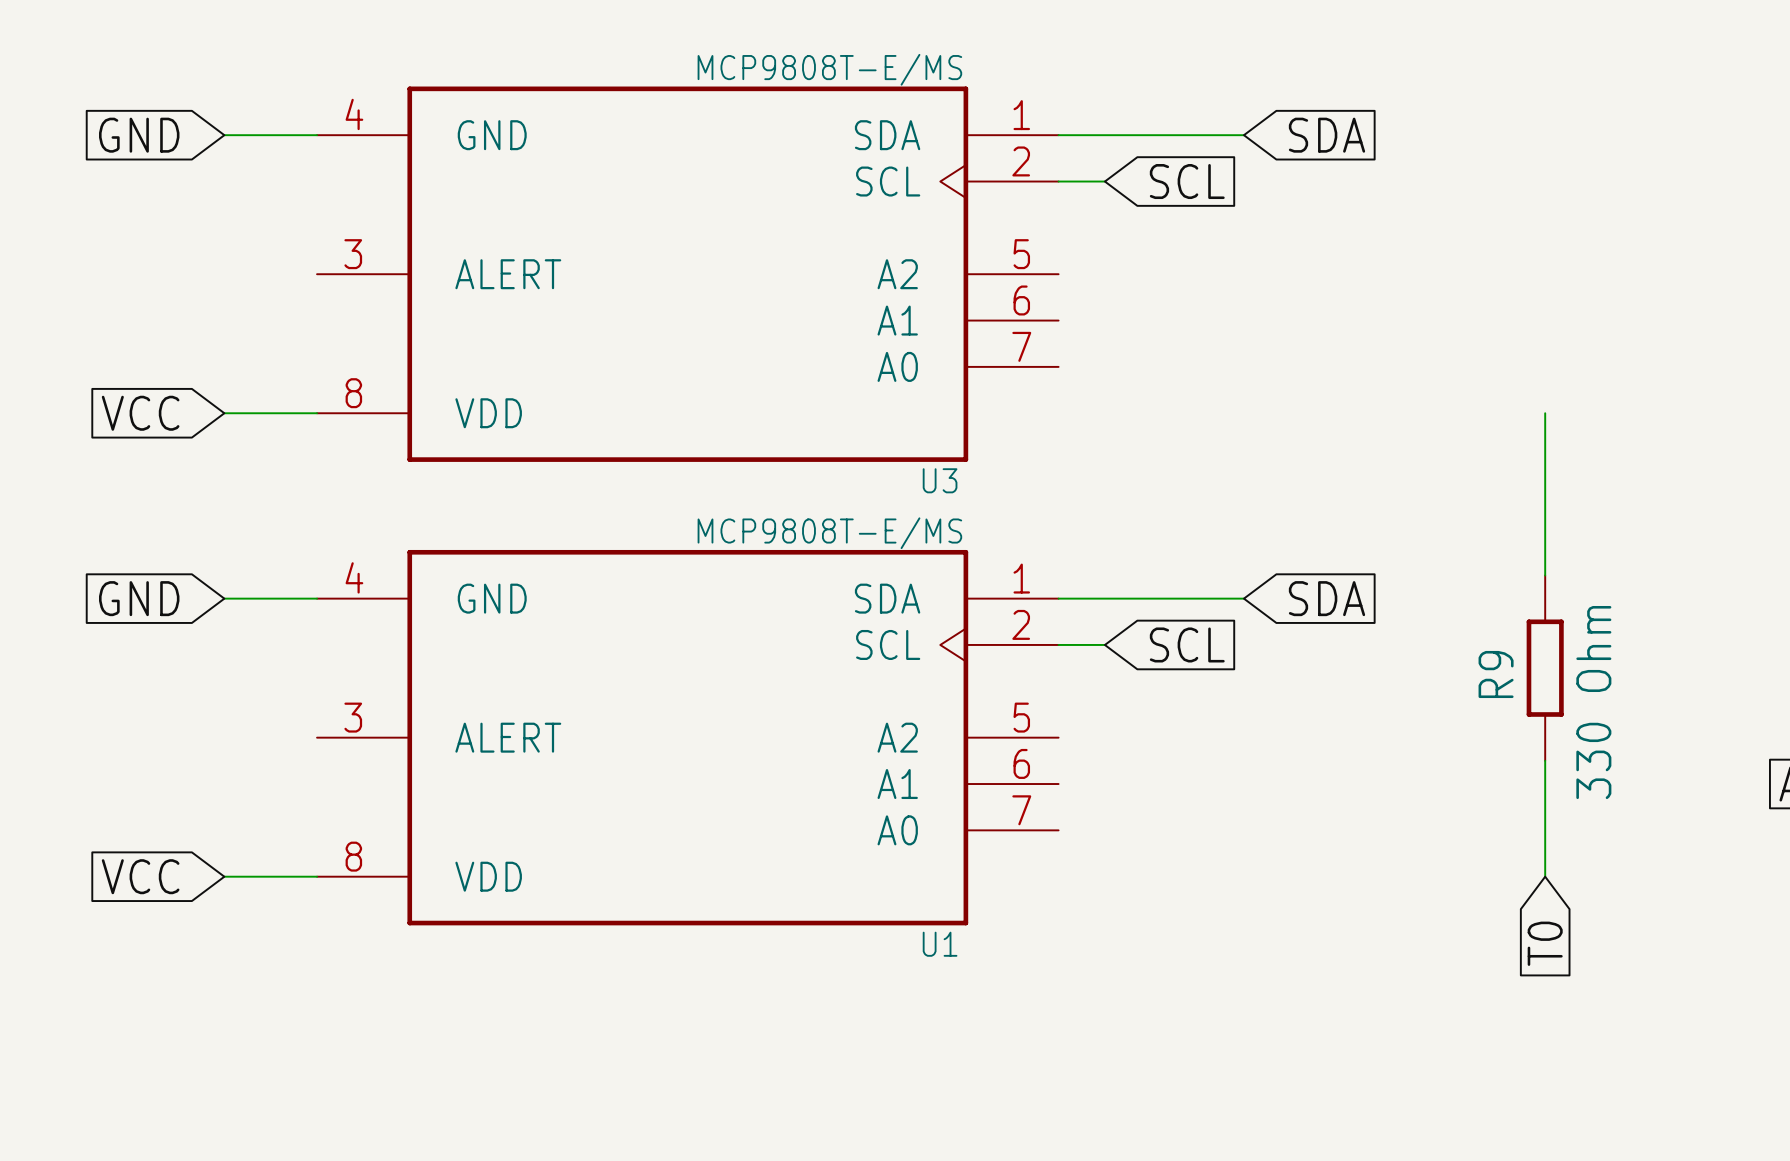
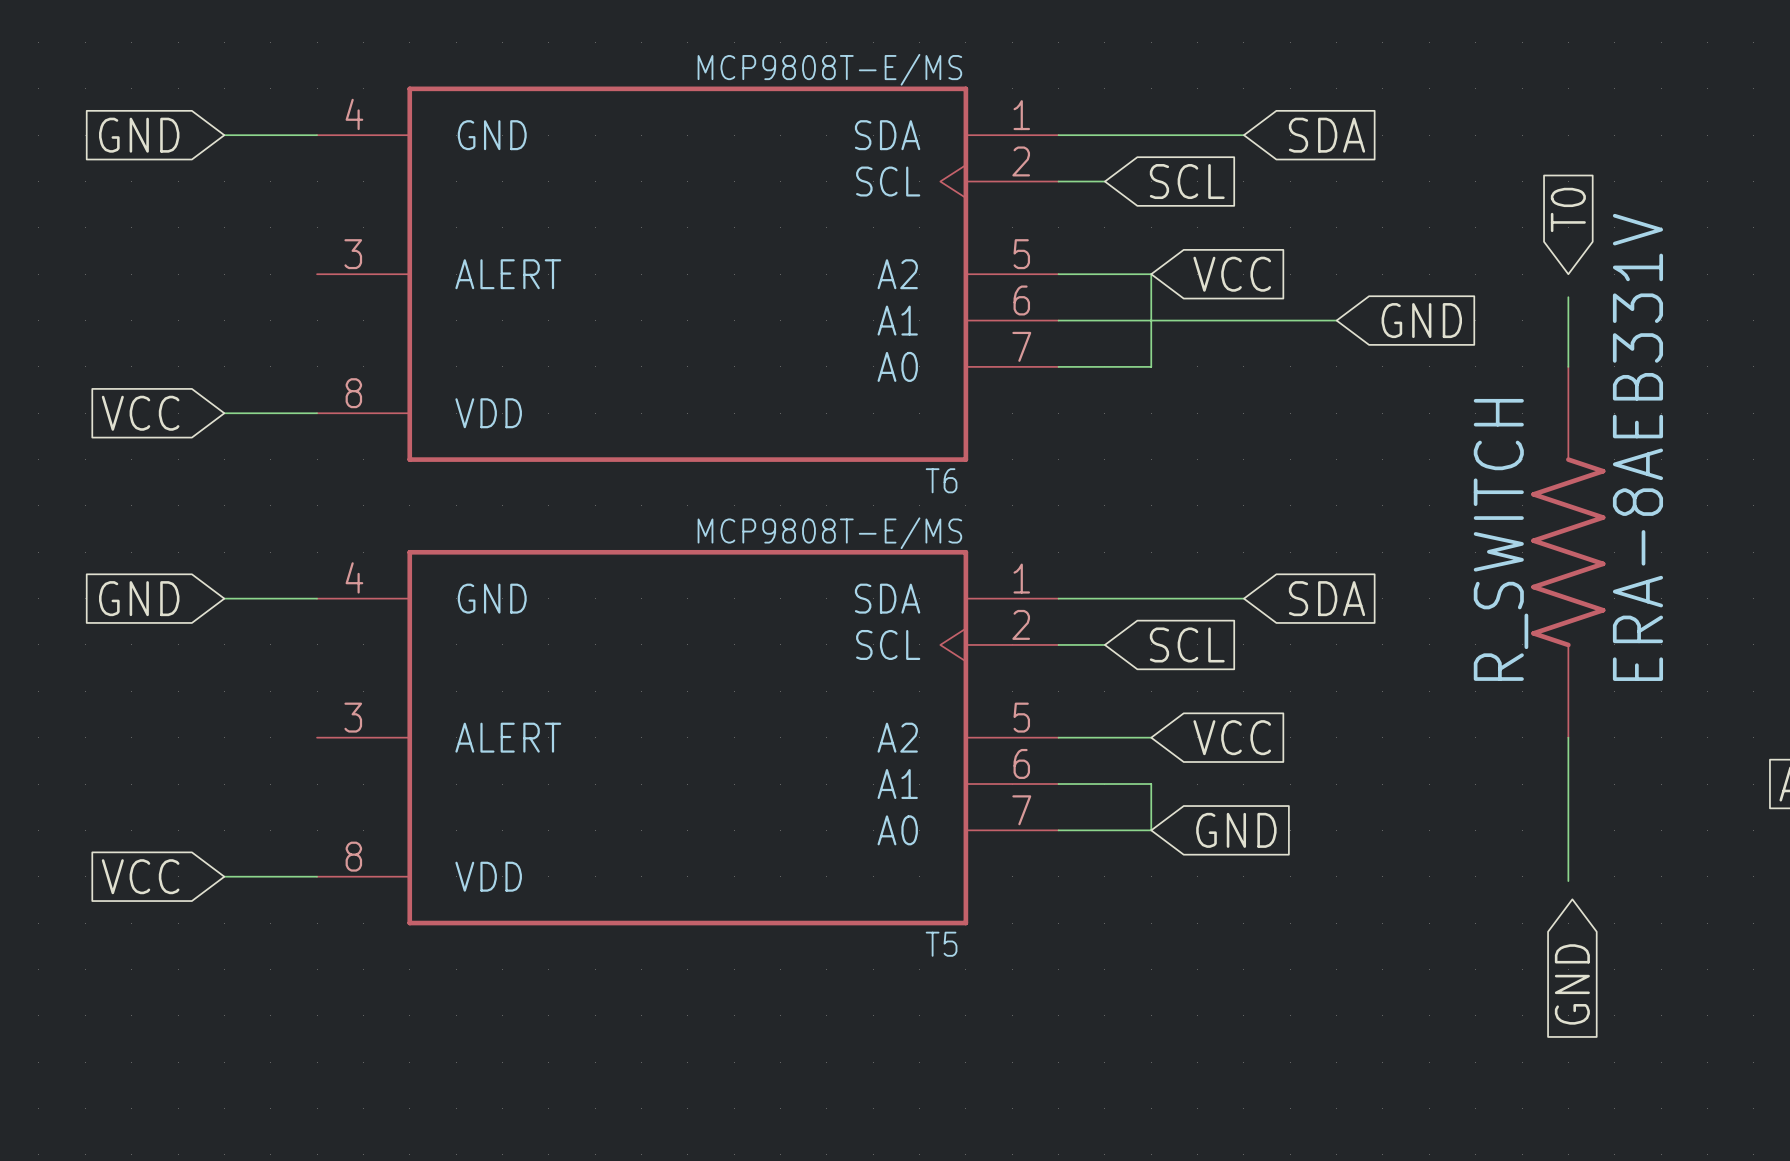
global label: none -> T0 (1568, 209)
wire: none -> (1058, 274) (1151, 274) (1151, 366) (1058, 366)
global label: none -> VCC (1232, 274)
wire: none -> (1568, 297) (1568, 366)
wire: none -> (1058, 320) (1336, 320)
global label: none -> GND (1421, 320)
wire: (1545, 413) (1545, 575) -> none
U3 name: U3 (940, 480) -> T6 (941, 480)
R_SWITCH: none -> ERA-8AEB331V (1568, 552)
R9: 330 Ohm (1545, 668) -> none
wire: none -> (1058, 737) (1151, 737)
global label: none -> VCC (1232, 737)
wire: none -> (1568, 737) (1568, 881)
wire: (1545, 760) (1545, 876) -> none
wire: none -> (1058, 784) (1151, 784) (1151, 830) (1058, 830)
global label: none -> GND (1236, 830)
global label: T0 (1545, 943) -> none
U1 name: U1 (940, 944) -> T5 (941, 944)
global label: none -> GND (1572, 984)

